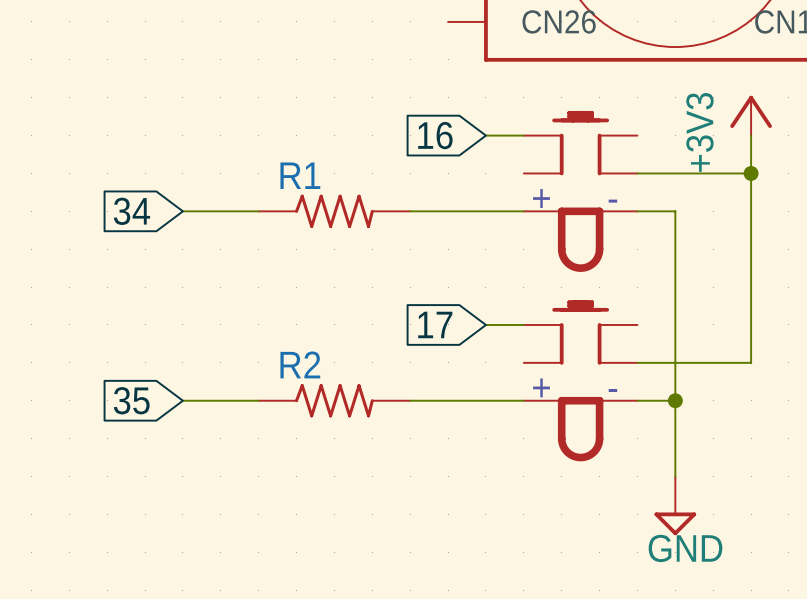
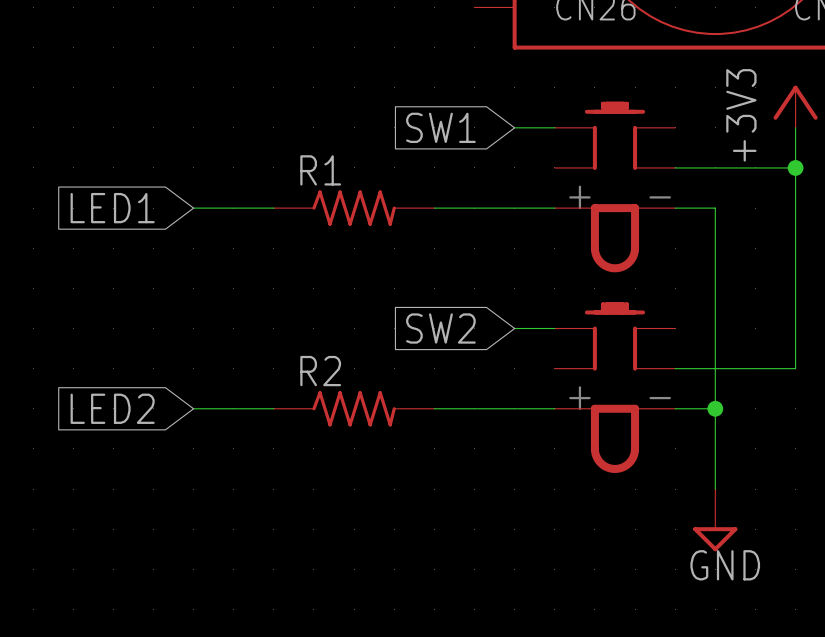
global label: 16 (435, 135) -> SW1 (440, 127)
global label: 34 (131, 211) -> LED1 (112, 208)
global label: 17 (435, 324) -> SW2 (440, 328)
global label: 35 (131, 400) -> LED2 (112, 408)

